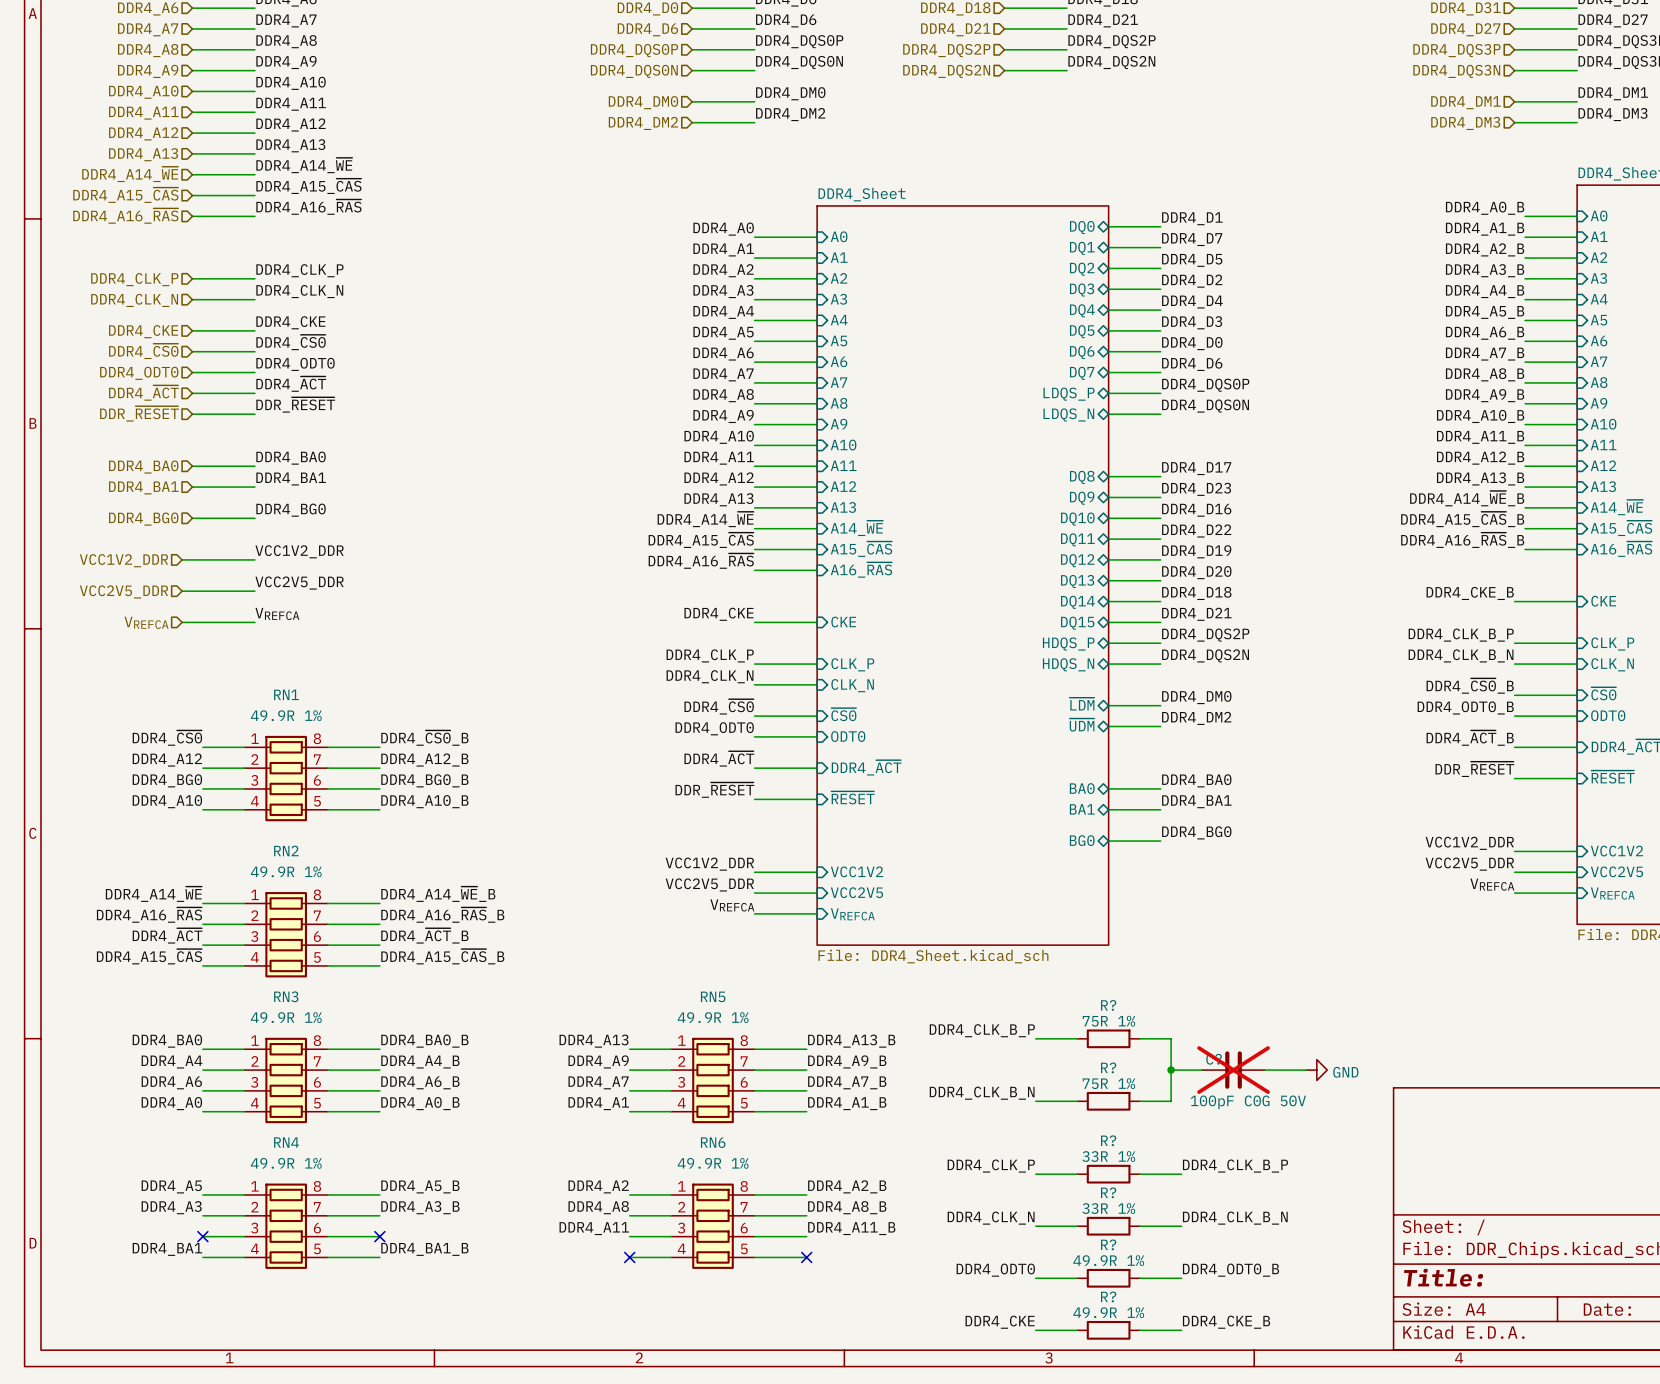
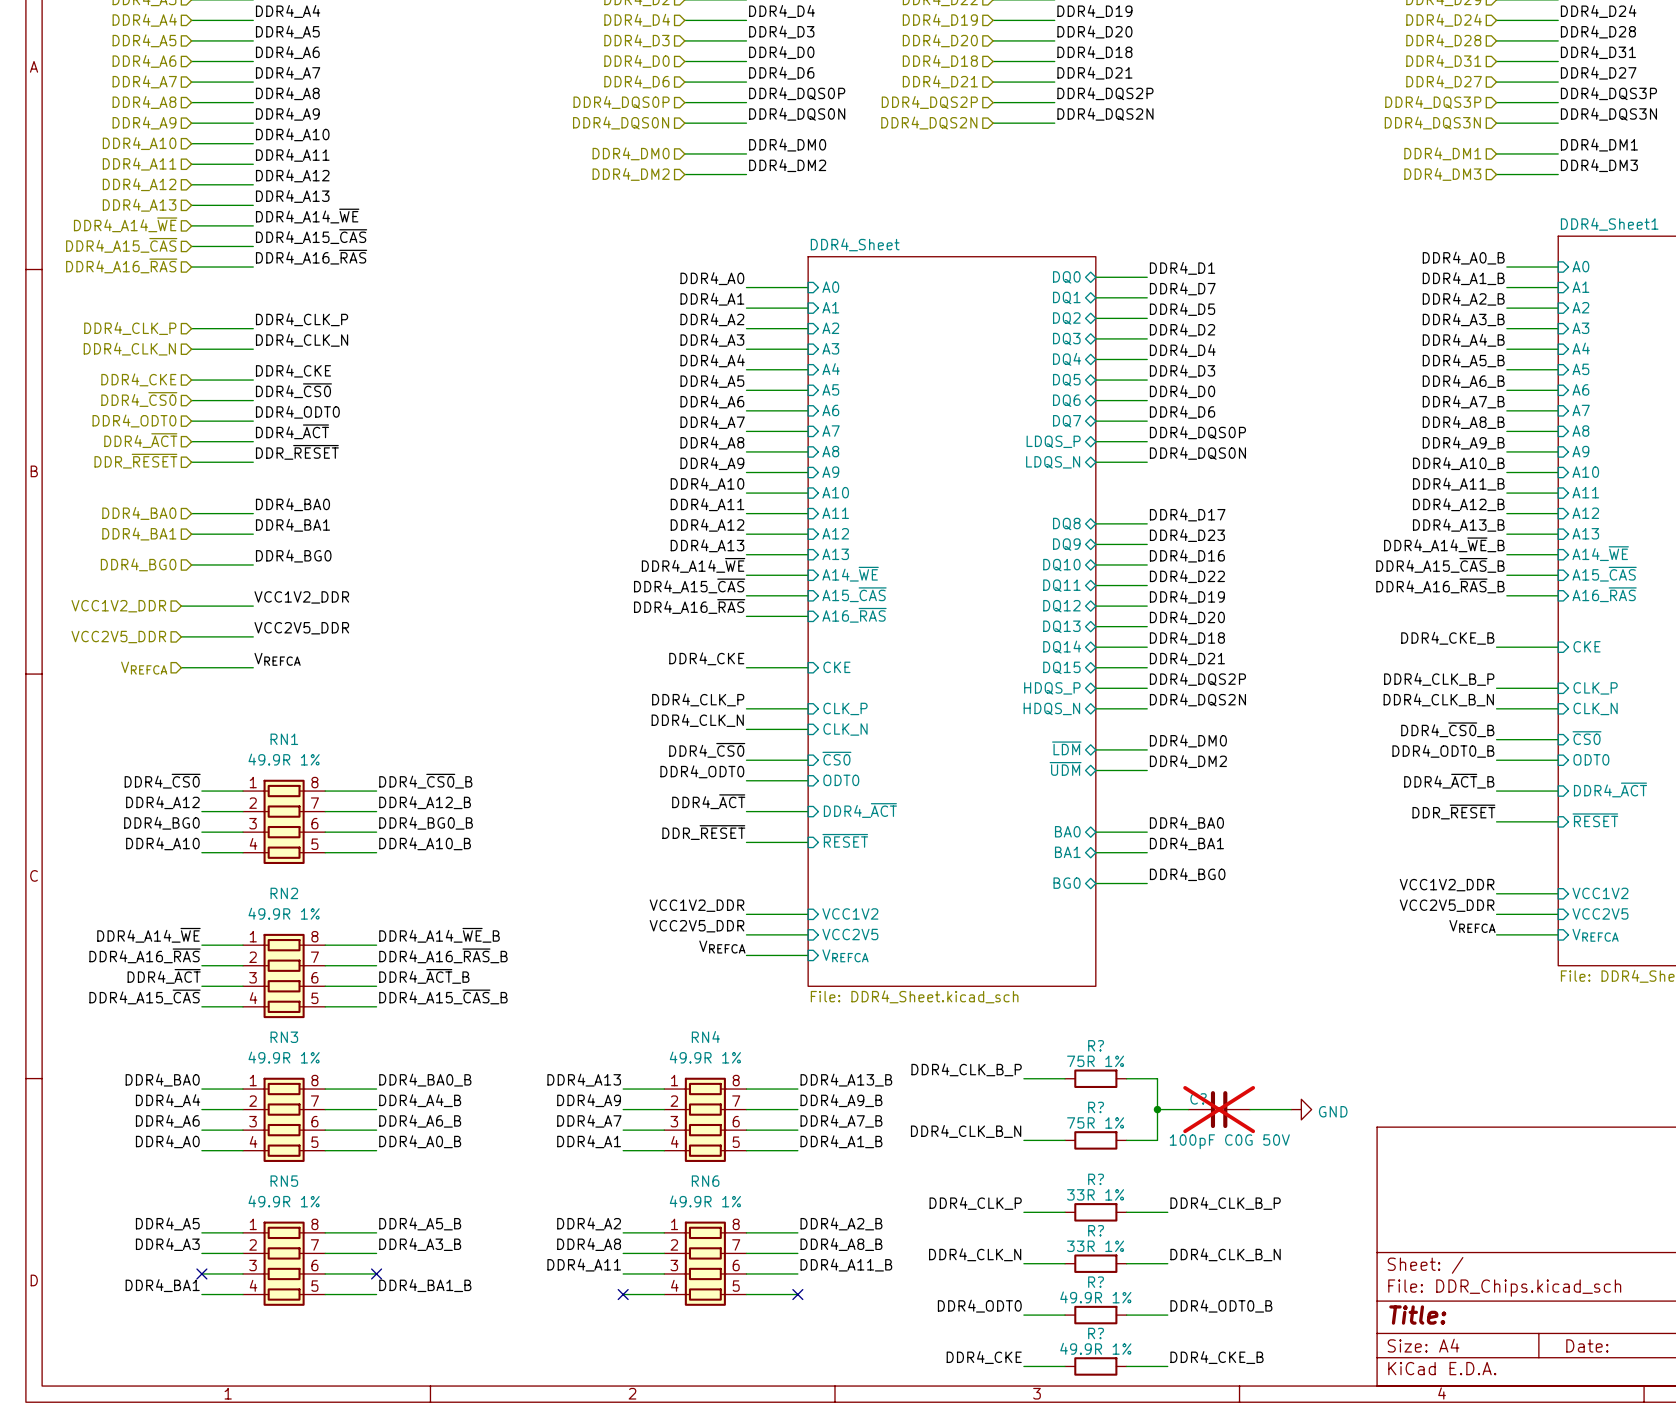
RN5 name: RN5 (713, 996) -> RN4 (705, 1037)
RN4 name: RN4 (286, 1142) -> RN5 (284, 1181)

